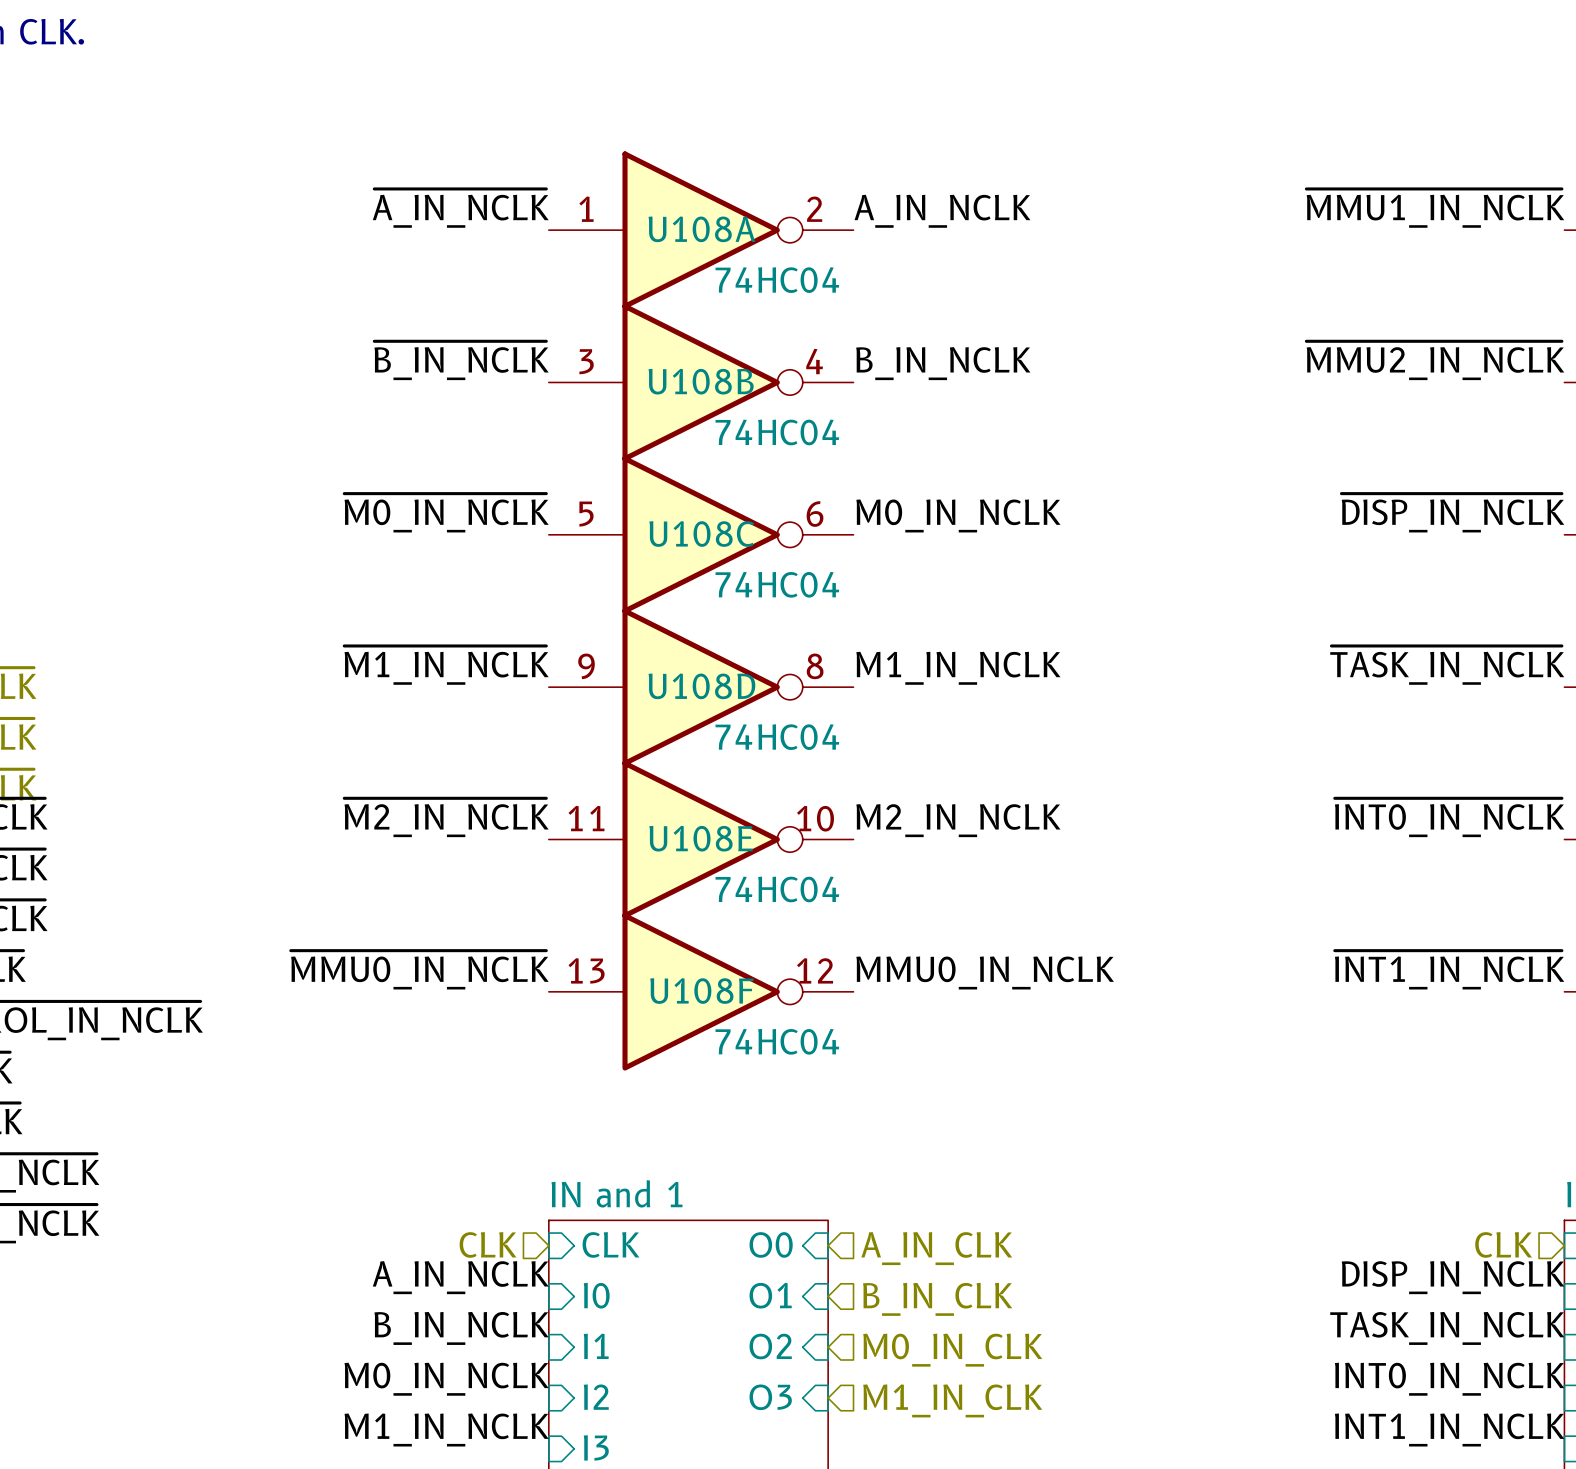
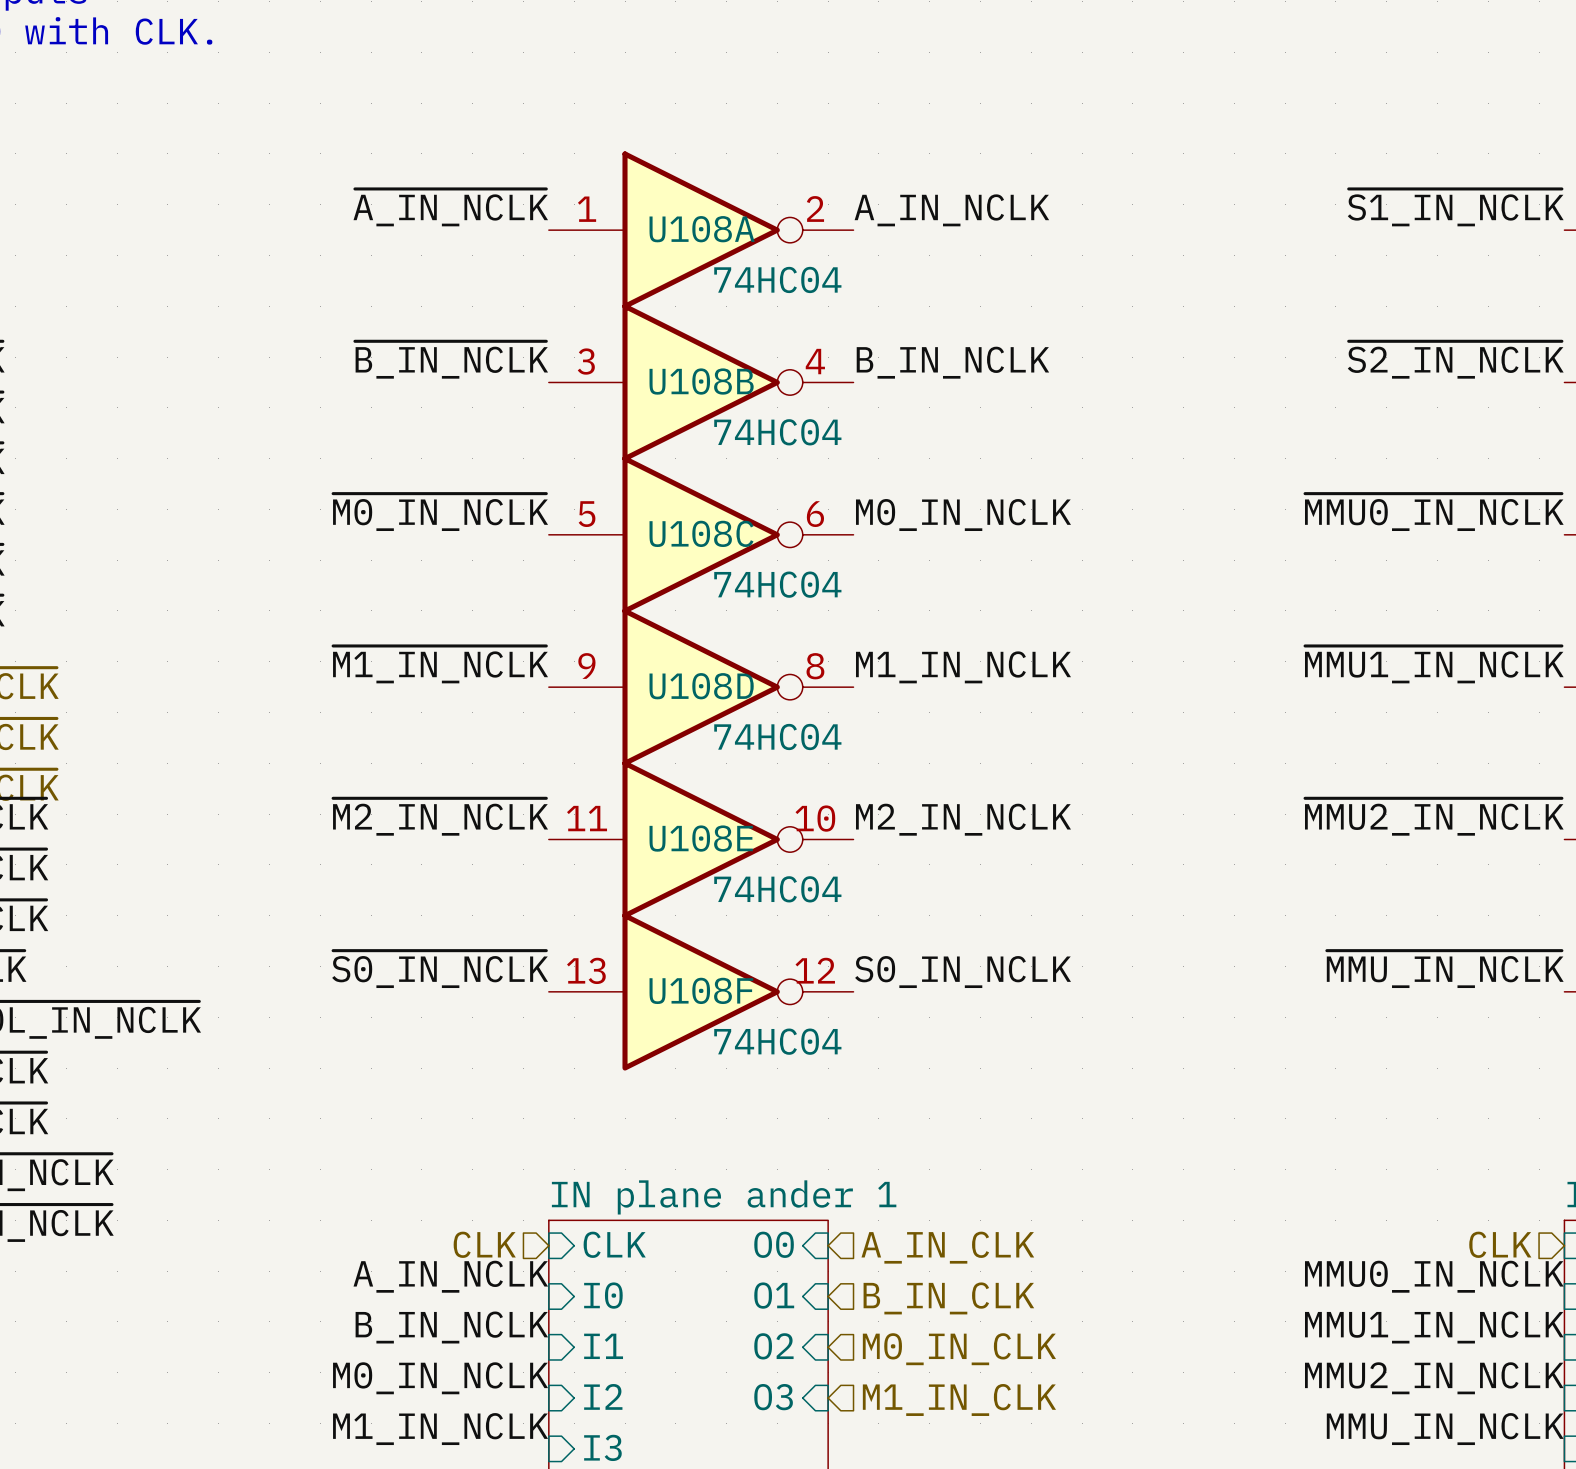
label: ~{MMU1_IN_NCLK} (1435, 208) -> ~{S1_IN_NCLK} (1455, 207)
label: ~{MMU2_IN_NCLK} (1435, 360) -> ~{S2_IN_NCLK} (1455, 359)
label: ~{DISP_IN_NCLK} (1452, 513) -> ~{MMU0_IN_NCLK} (1434, 512)
label: ~{TASK_IN_NCLK} (1447, 665) -> ~{MMU1_IN_NCLK} (1434, 664)
label: ~{INT0_IN_NCLK} (1449, 817) -> ~{MMU2_IN_NCLK} (1434, 816)
label: ~{MMU0_IN_NCLK} (419, 970) -> ~{S0_IN_NCLK} (440, 969)
label: ~{INT1_IN_NCLK} (1449, 970) -> ~{MMU_IN_NCLK} (1445, 969)
label: MMU0_IN_NCLK (985, 972) -> S0_IN_NCLK (963, 972)
sheet IN and 1 name: IN and 1 (616, 1193) -> IN plane ander 1 (724, 1197)
label: DISP_IN_NCLK (1453, 1277) -> MMU0_IN_NCLK (1434, 1276)
label: TASK_IN_NCLK (1447, 1328) -> MMU1_IN_NCLK (1434, 1327)
label: INT0_IN_NCLK (1449, 1379) -> MMU2_IN_NCLK (1434, 1378)
label: INT1_IN_NCLK (1449, 1430) -> MMU_IN_NCLK (1445, 1429)

